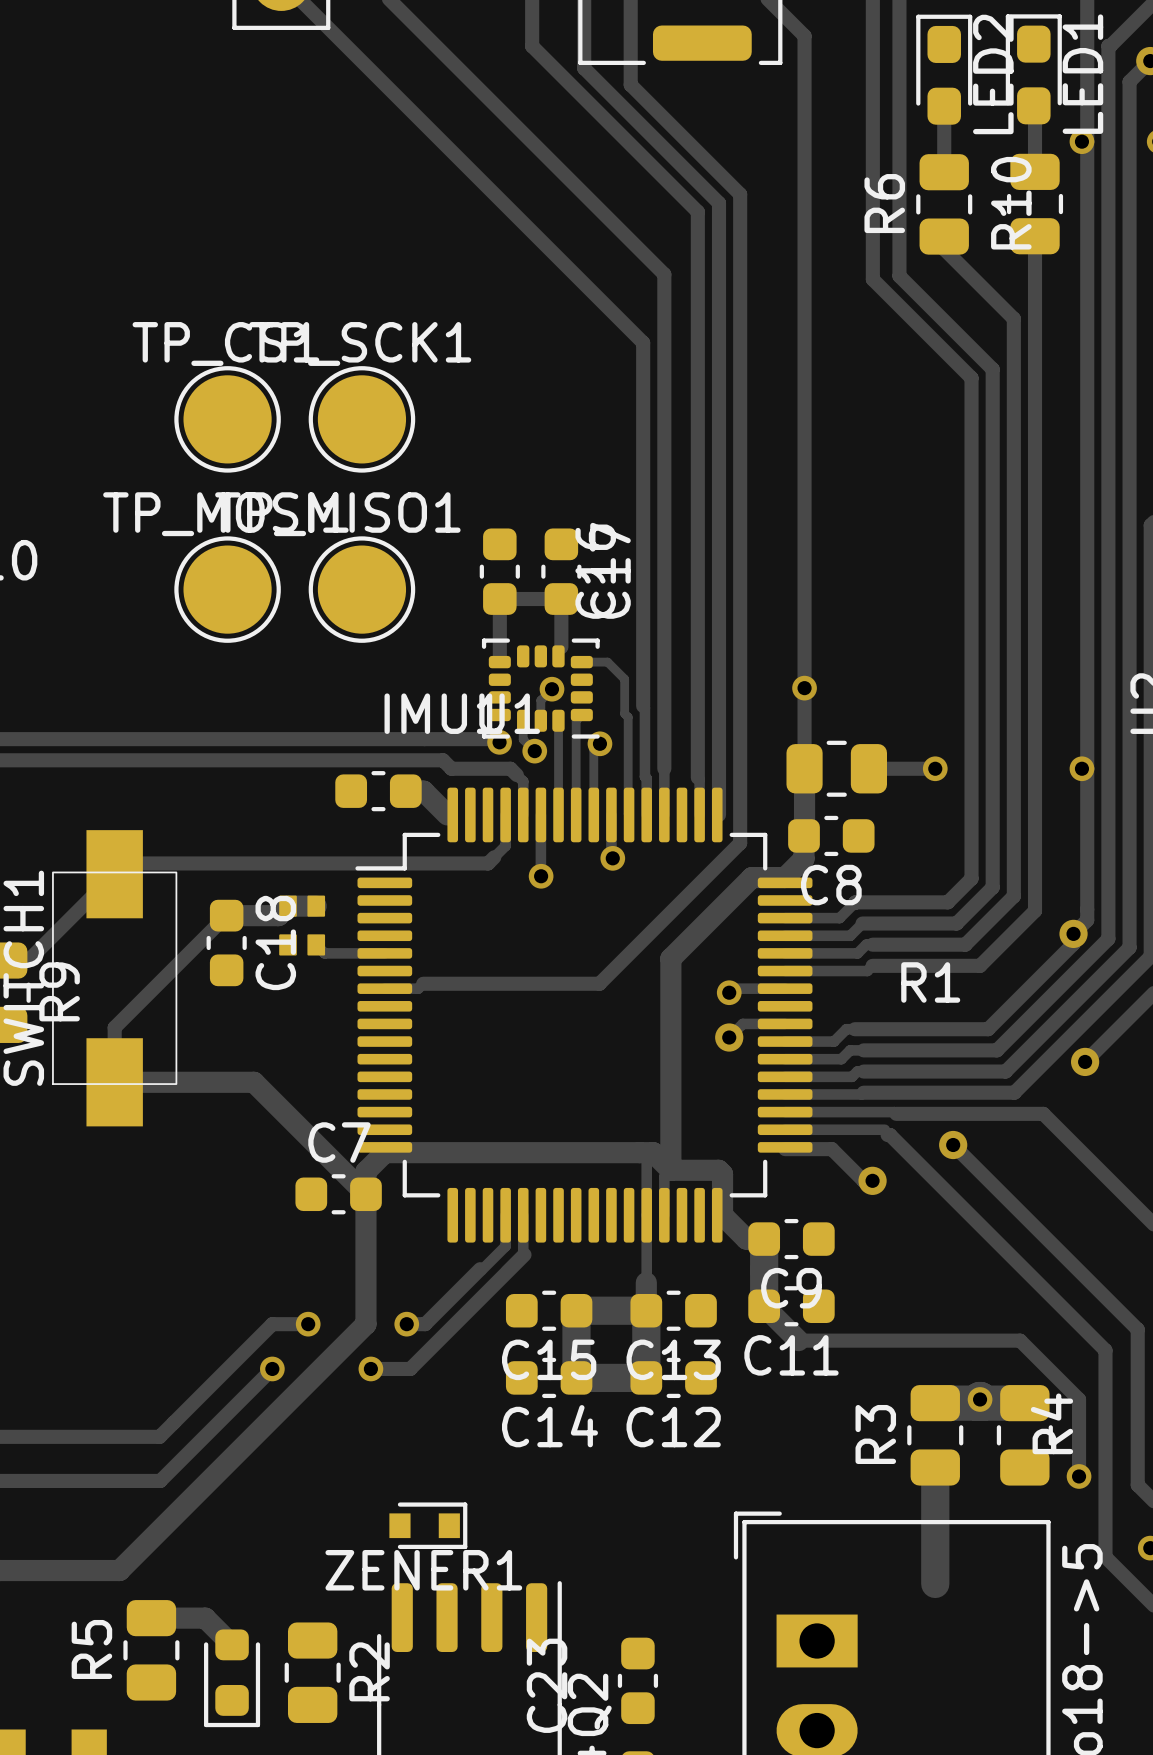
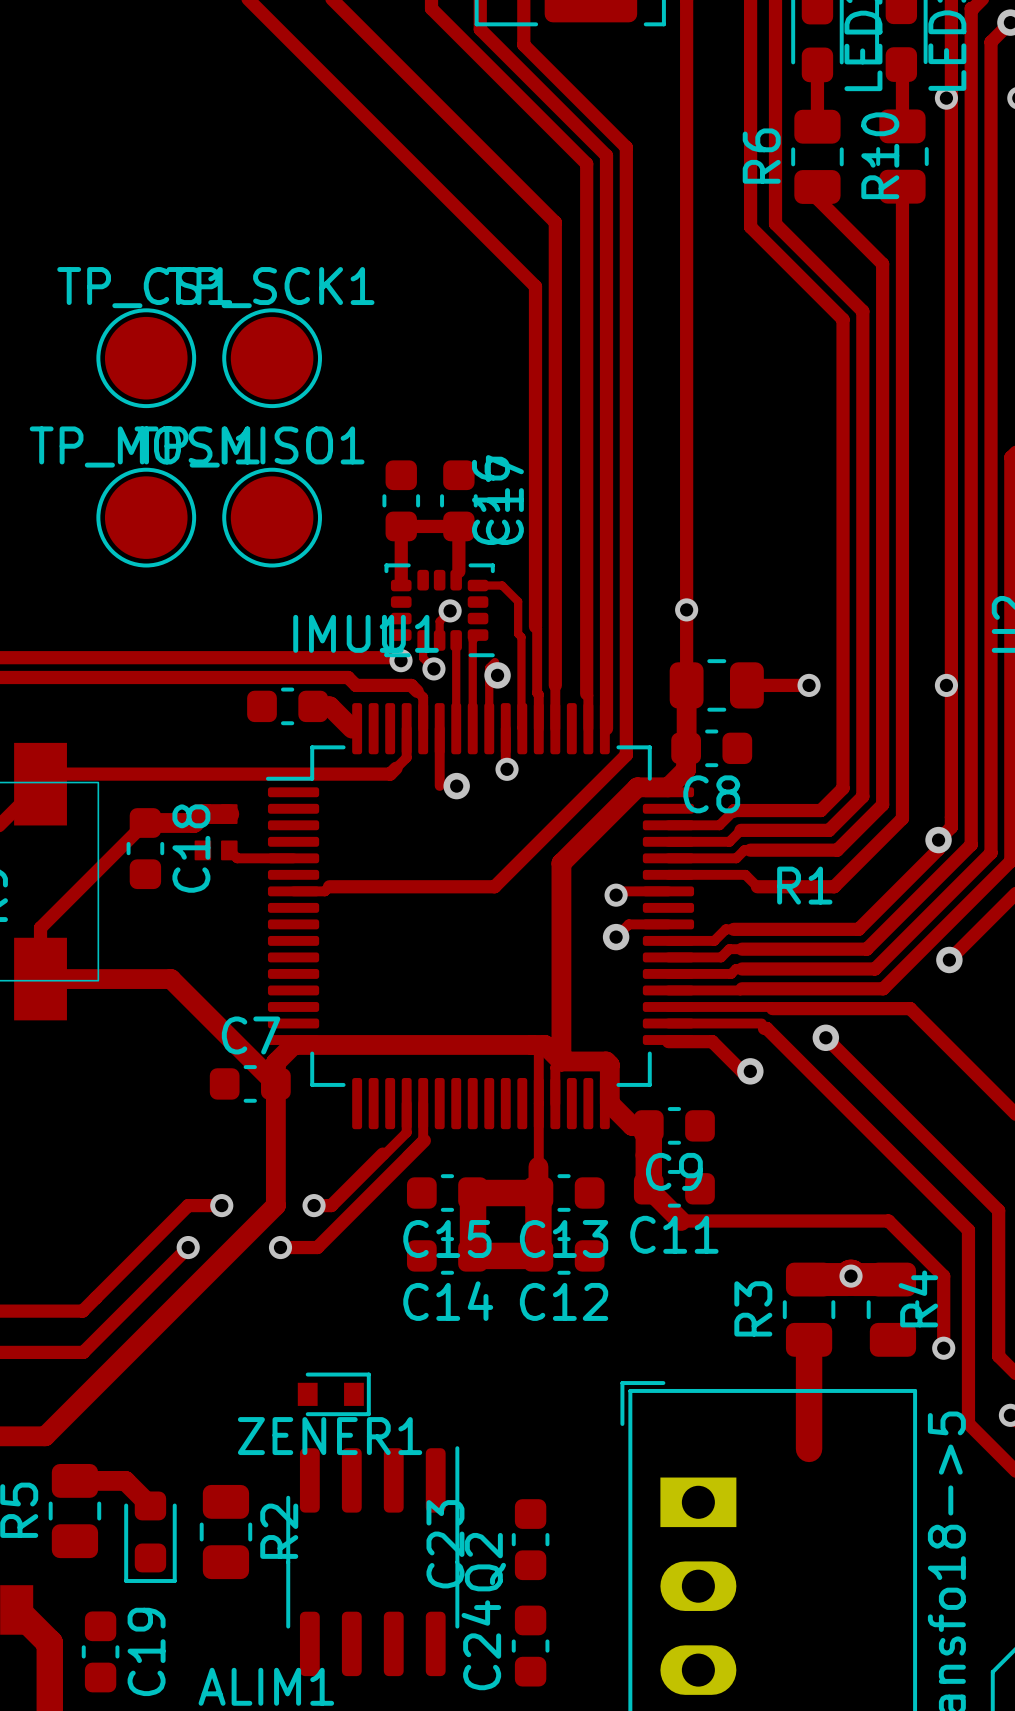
via position: (599, 743) -> (497, 675)
via position: (541, 876) -> (456, 786)
track: (980, 965) (872, 965) (867, 971) -> (851, 869) (834, 886) (757, 886) (745, 874)

